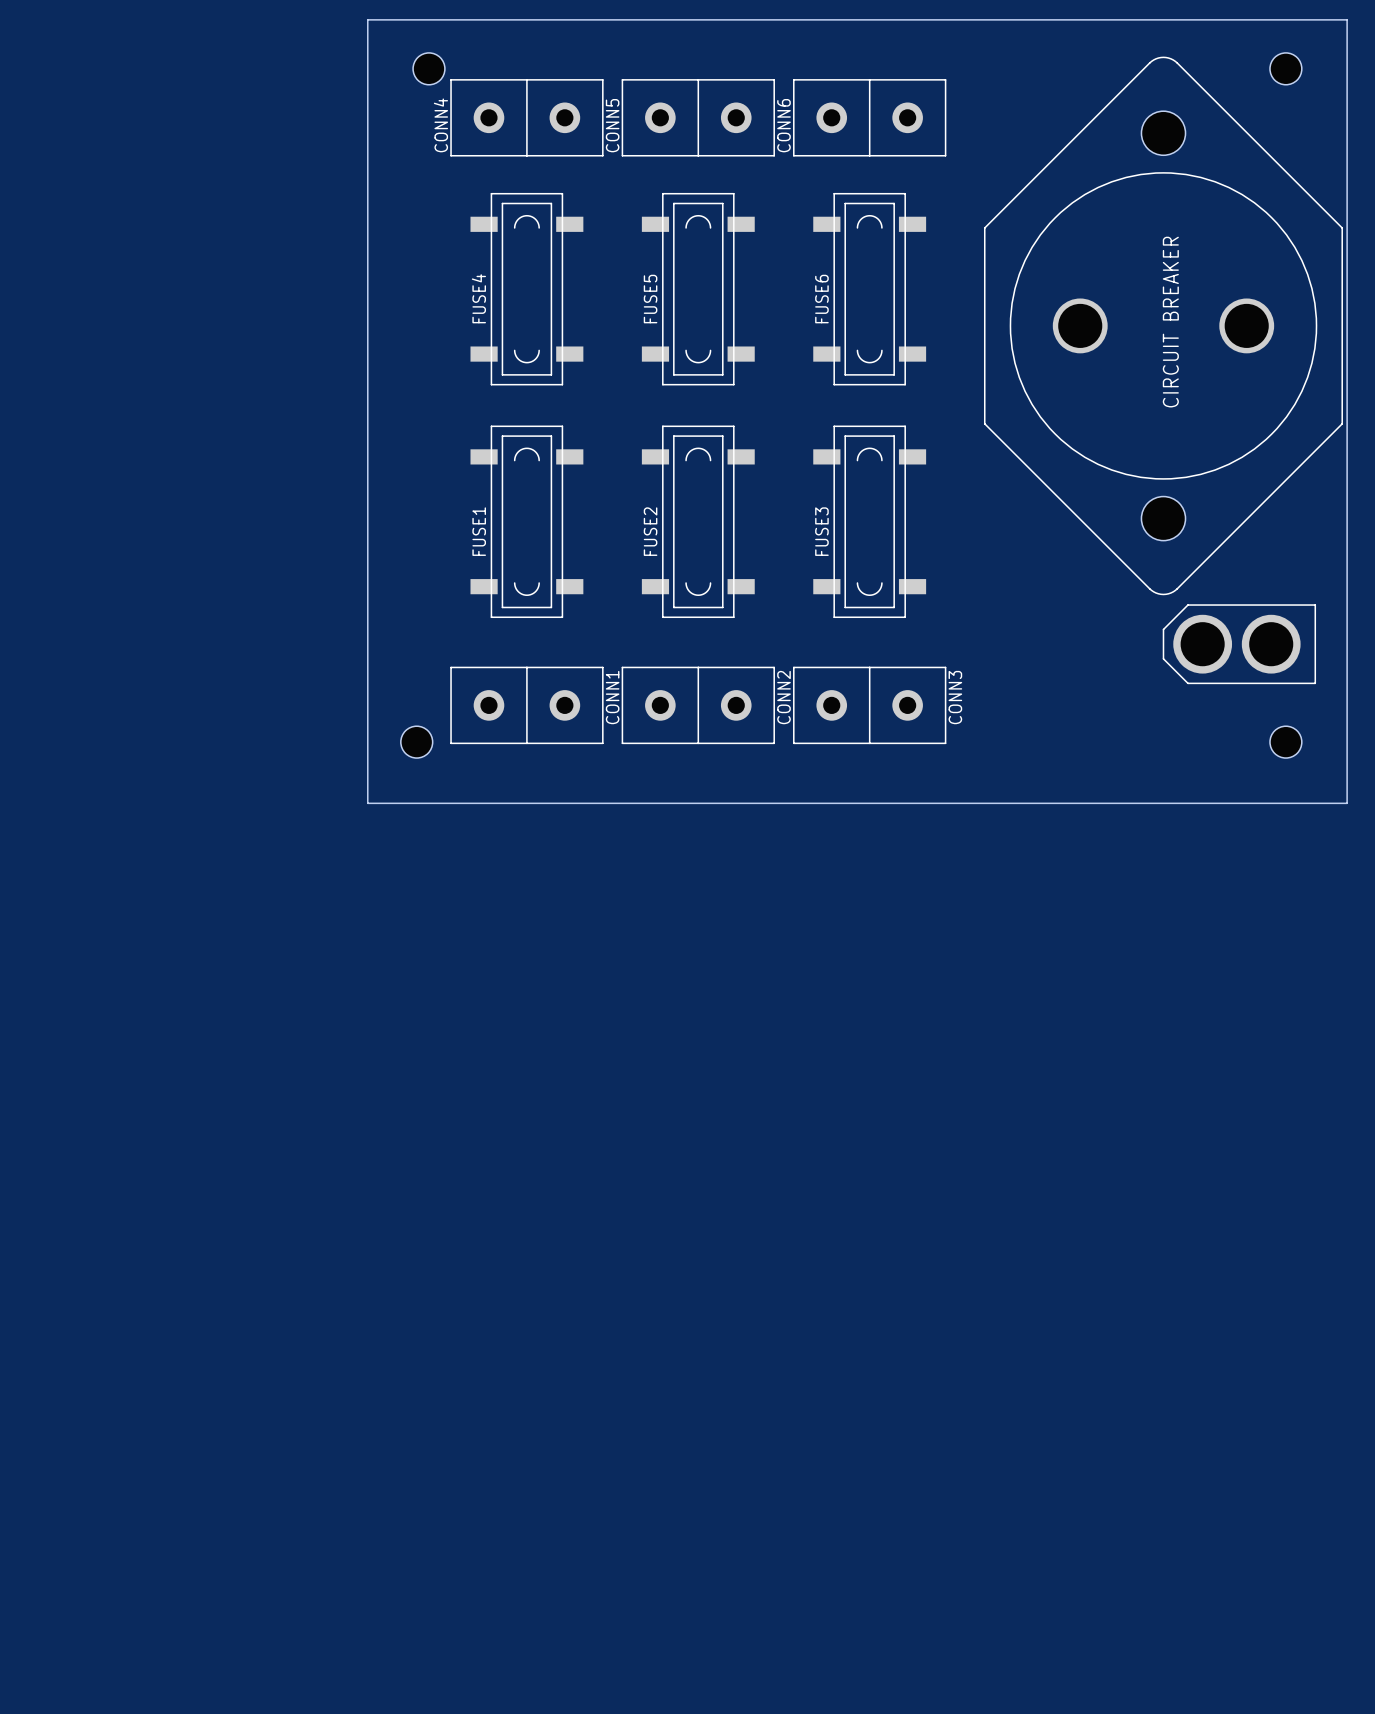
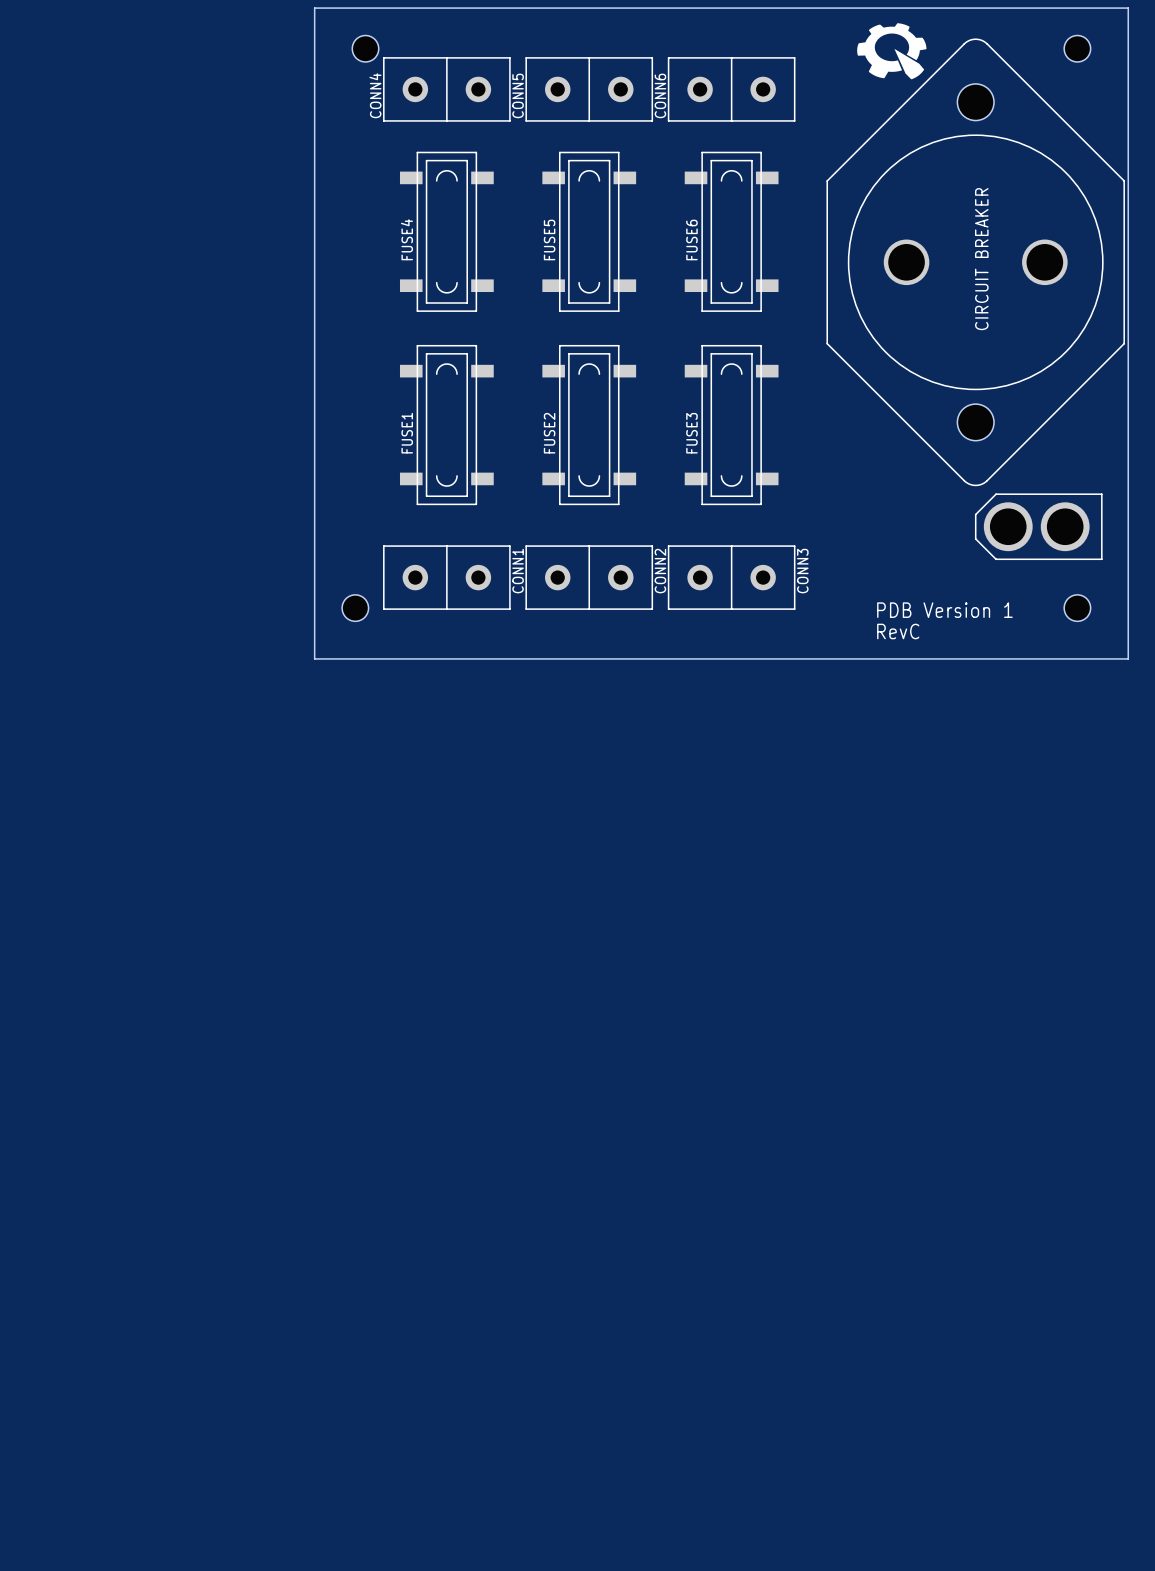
drawing: none -> [857, 23, 927, 80]
text: none -> PDB Version 1 (944, 610)
text: none -> RevC (898, 631)

